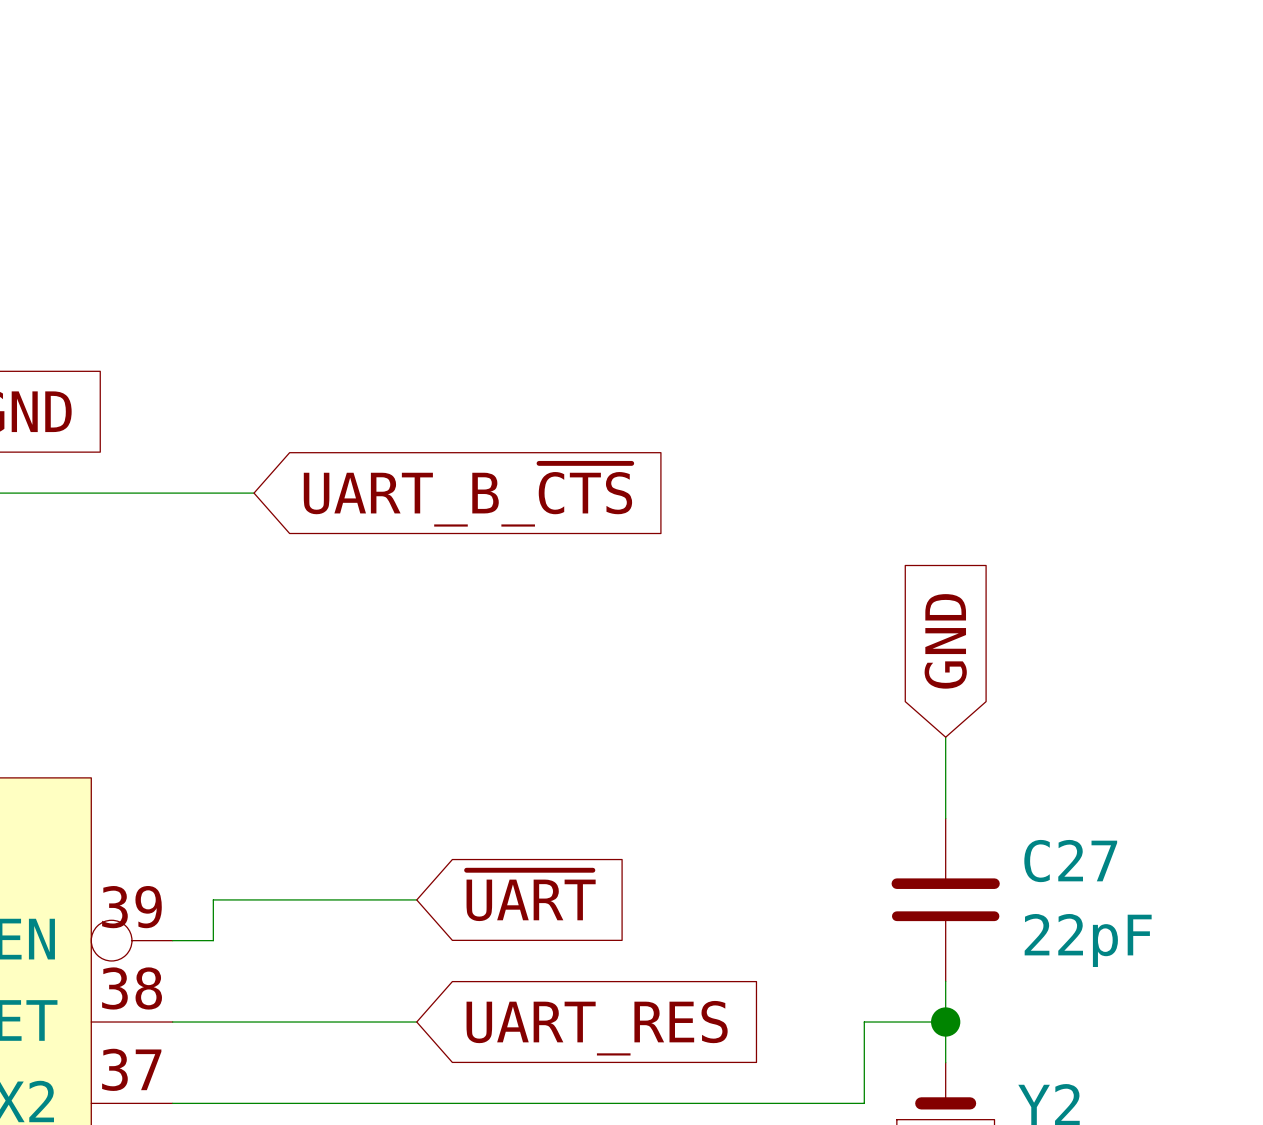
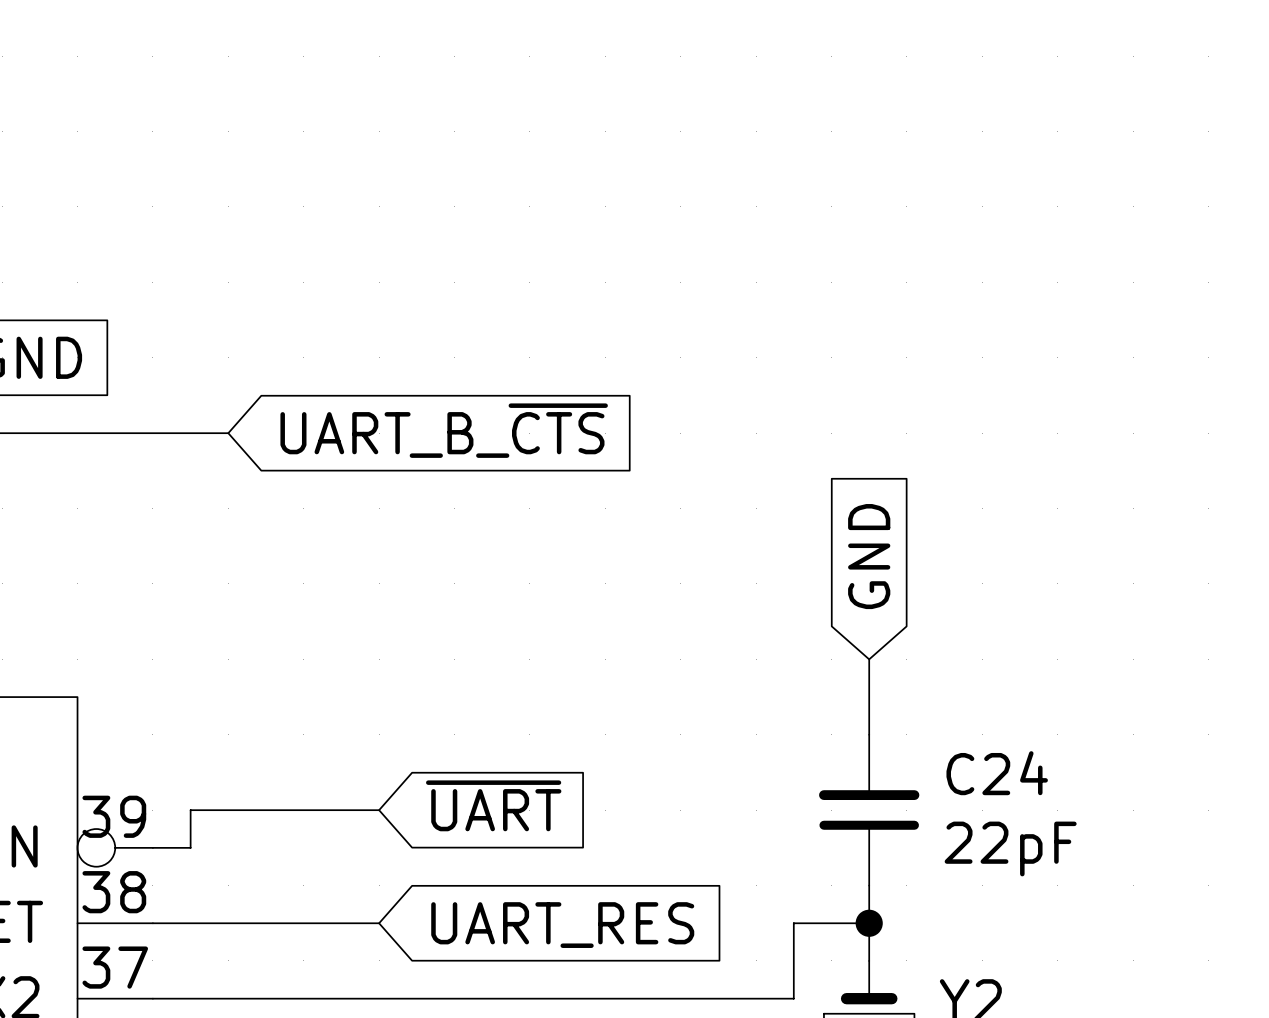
C27 name: C27 (1070, 861) -> C24 (997, 773)

